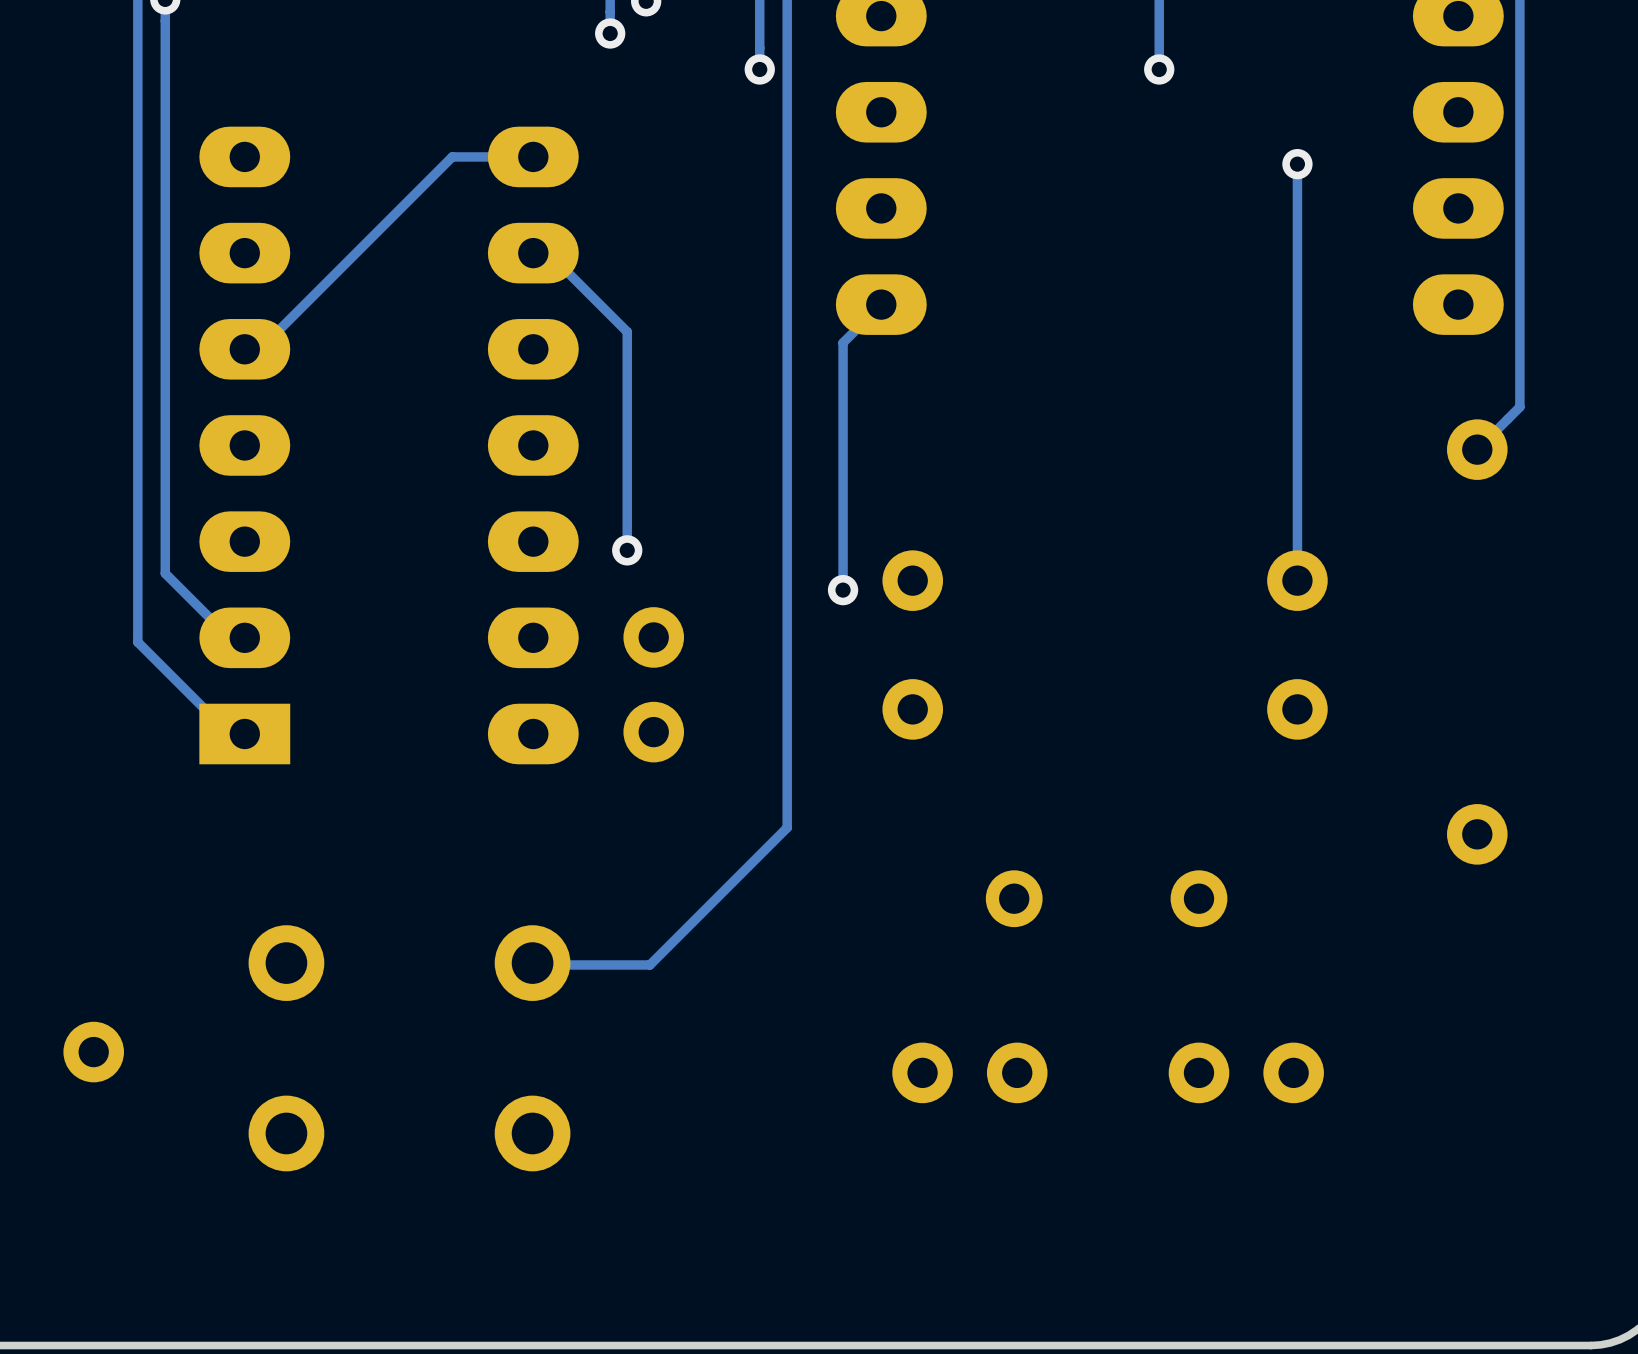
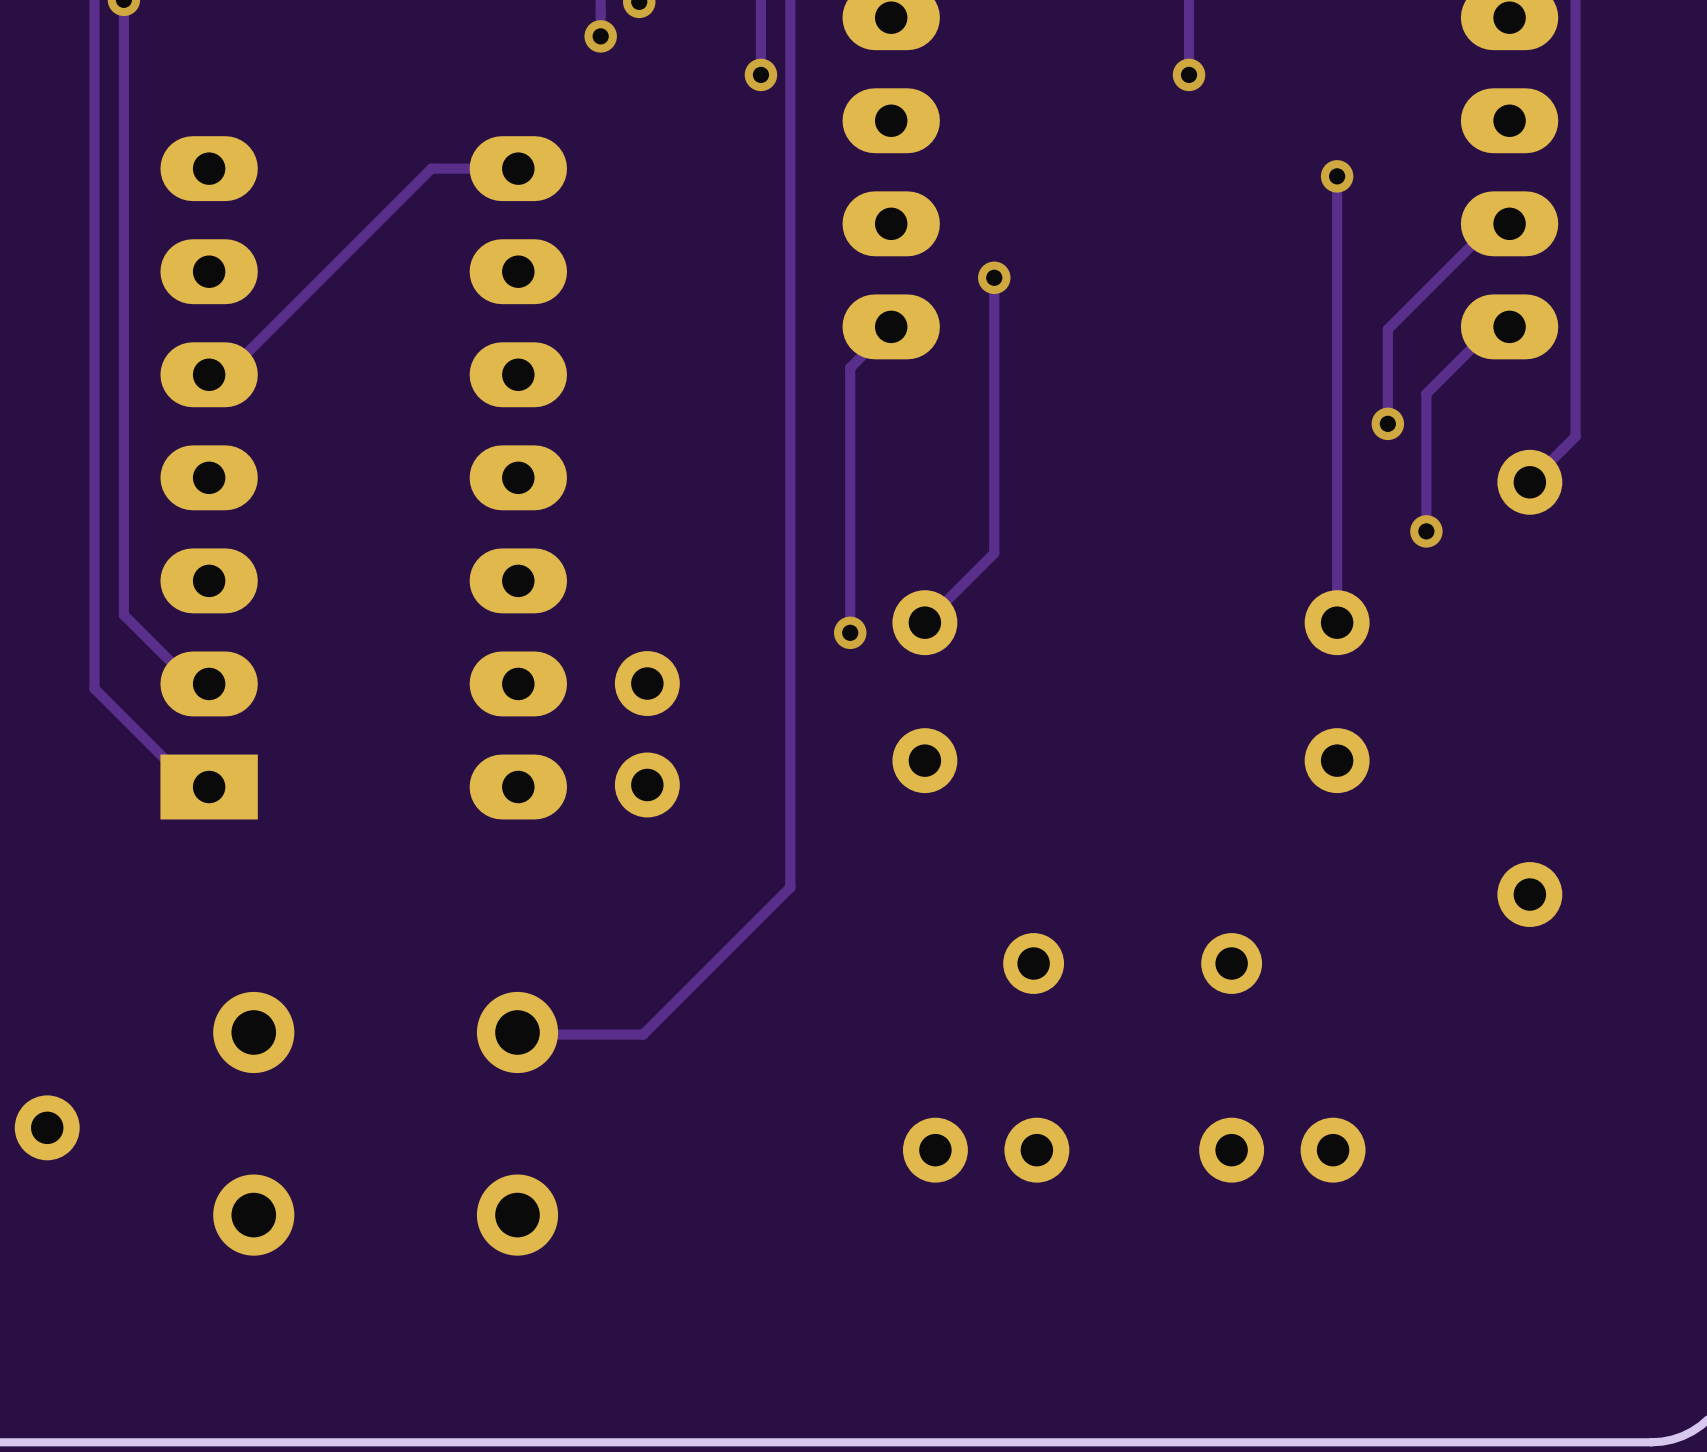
track: none -> (1509, 223) (1493, 223) (1387, 329) (1387, 423)
track: (533, 253) (548, 253) (627, 331) (627, 550) -> none
track: none -> (994, 277) (994, 553) (924, 622)
via: none -> (994, 277)
track: none -> (1509, 326) (1493, 326) (1426, 393) (1426, 531)
via: none -> (1387, 423)
via: none -> (1426, 531)
via: (627, 550) -> none

